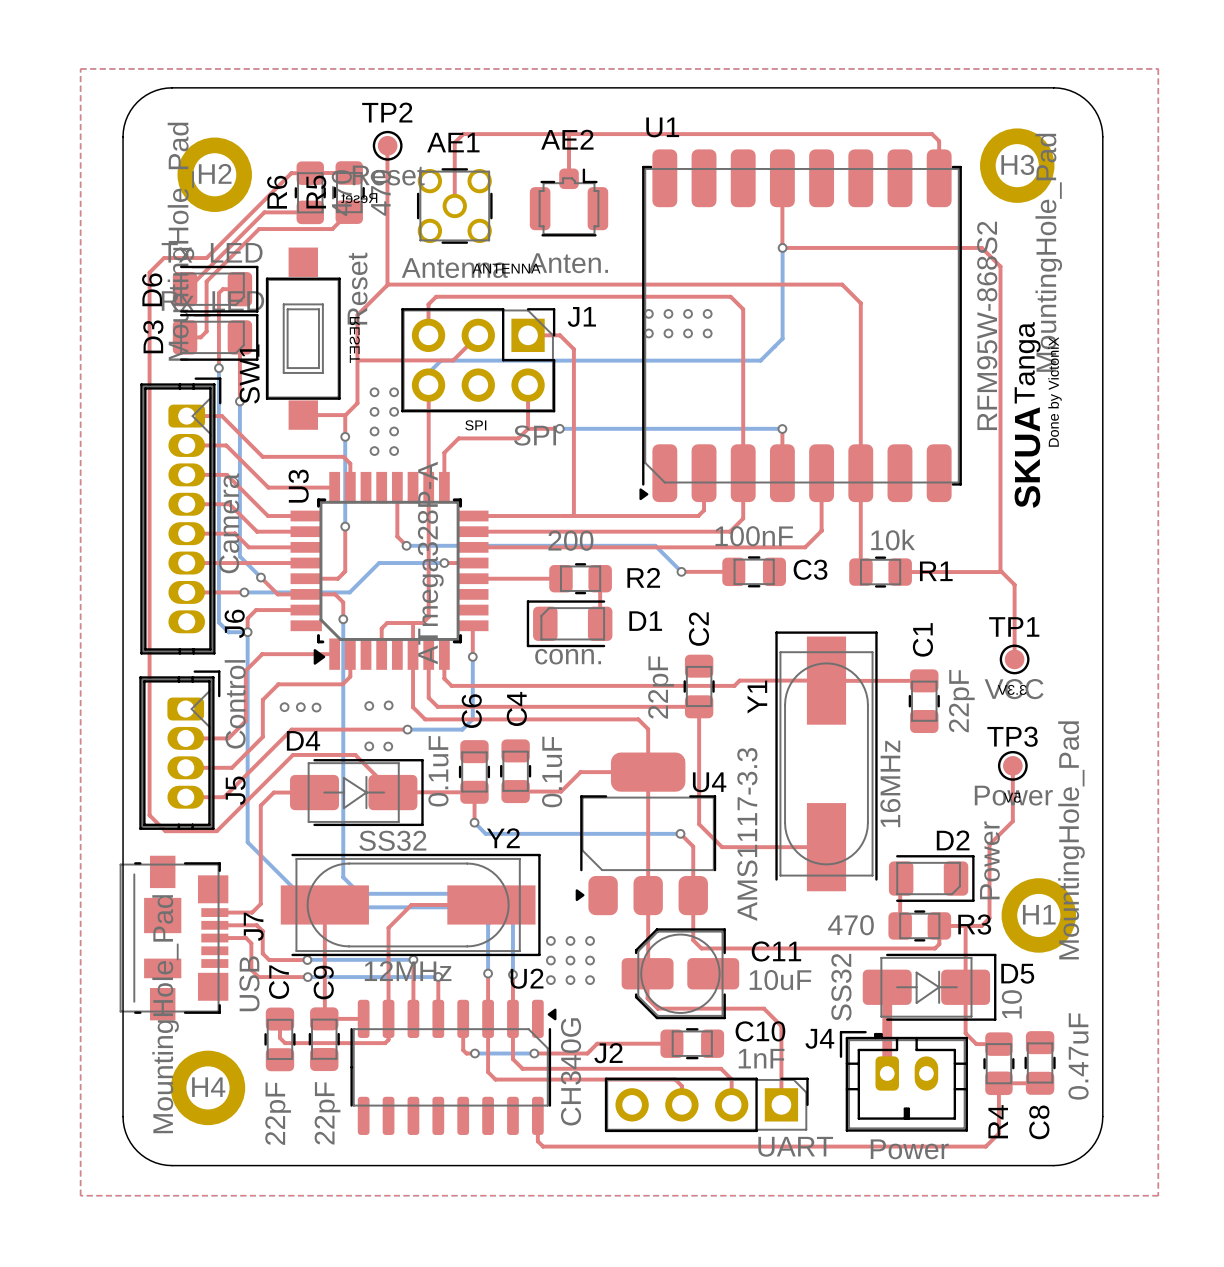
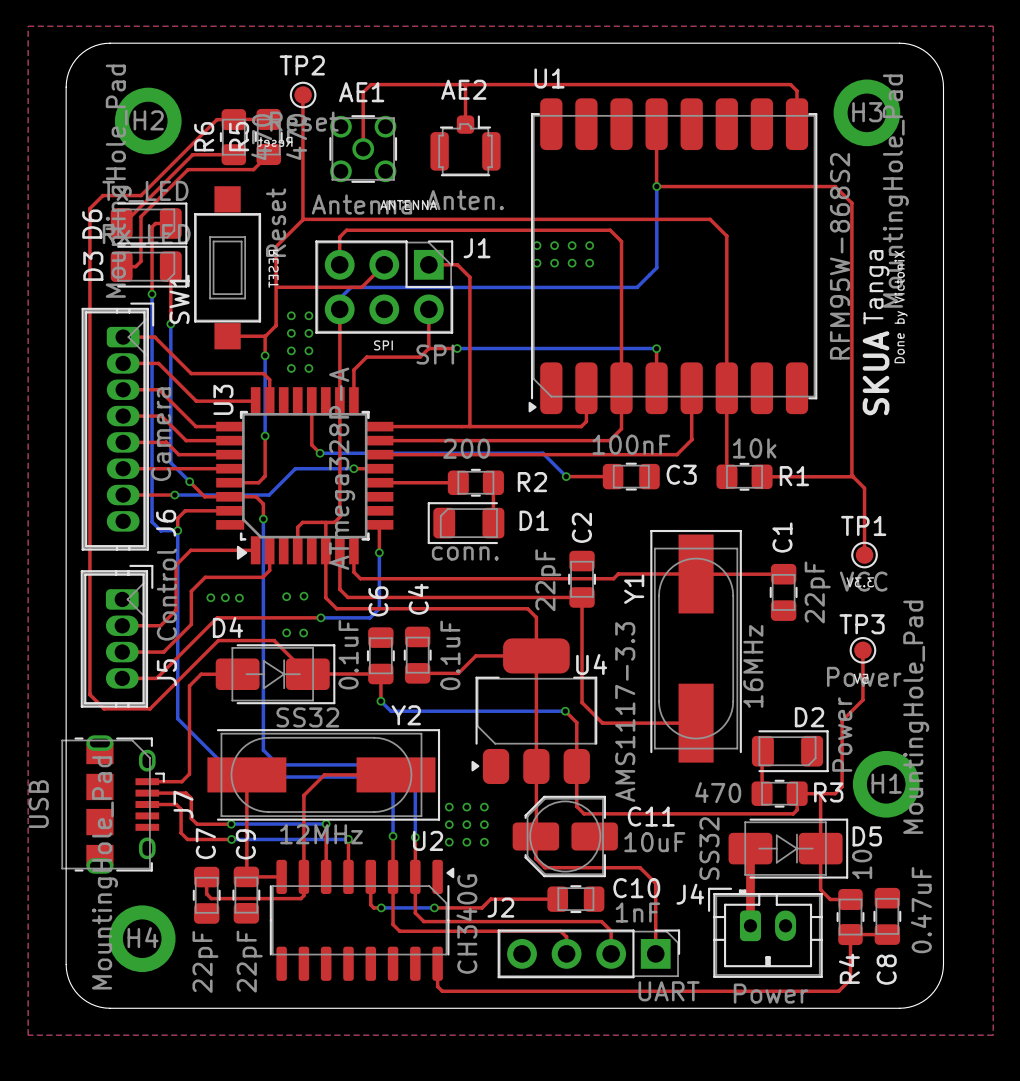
J7 footprint: [119, 855, 229, 1021] -> [61, 735, 165, 874]
J7 value position: USB (249, 983) -> USB (38, 804)

